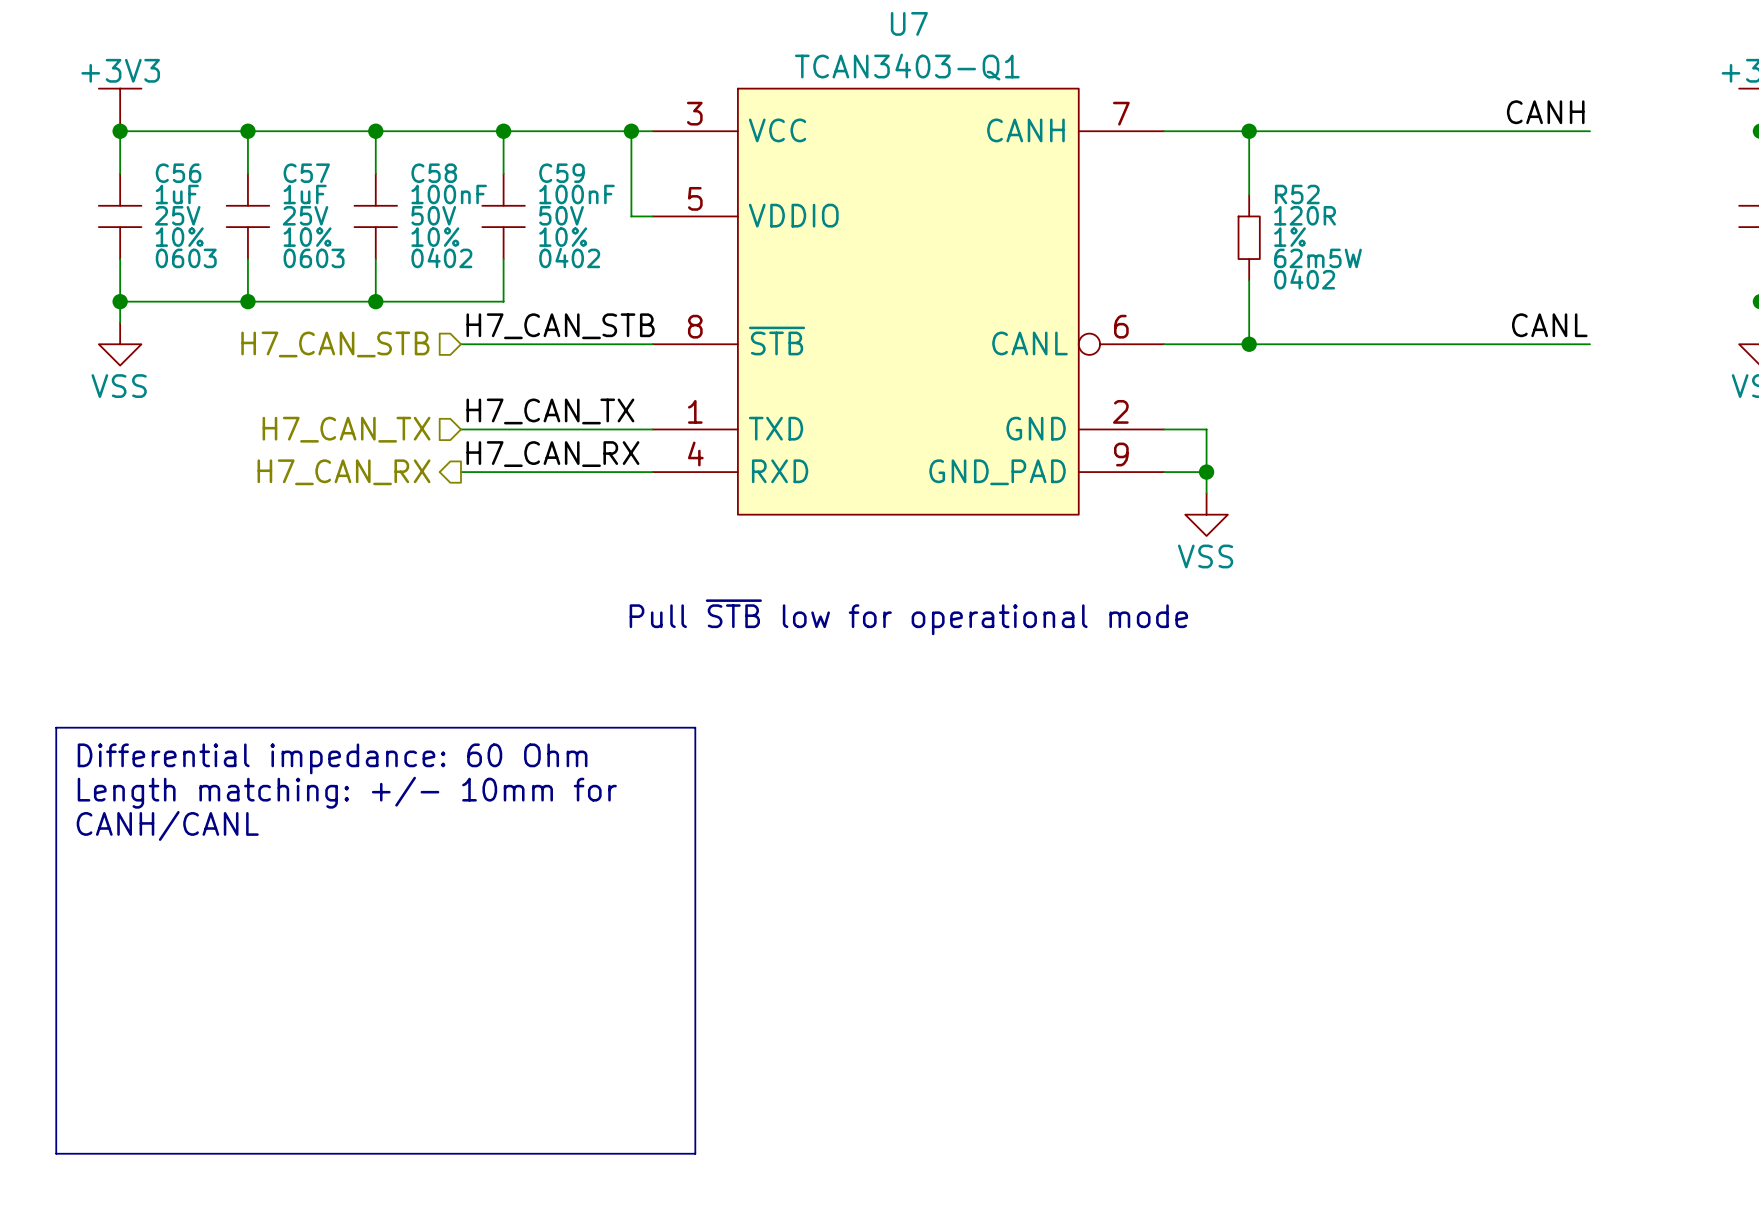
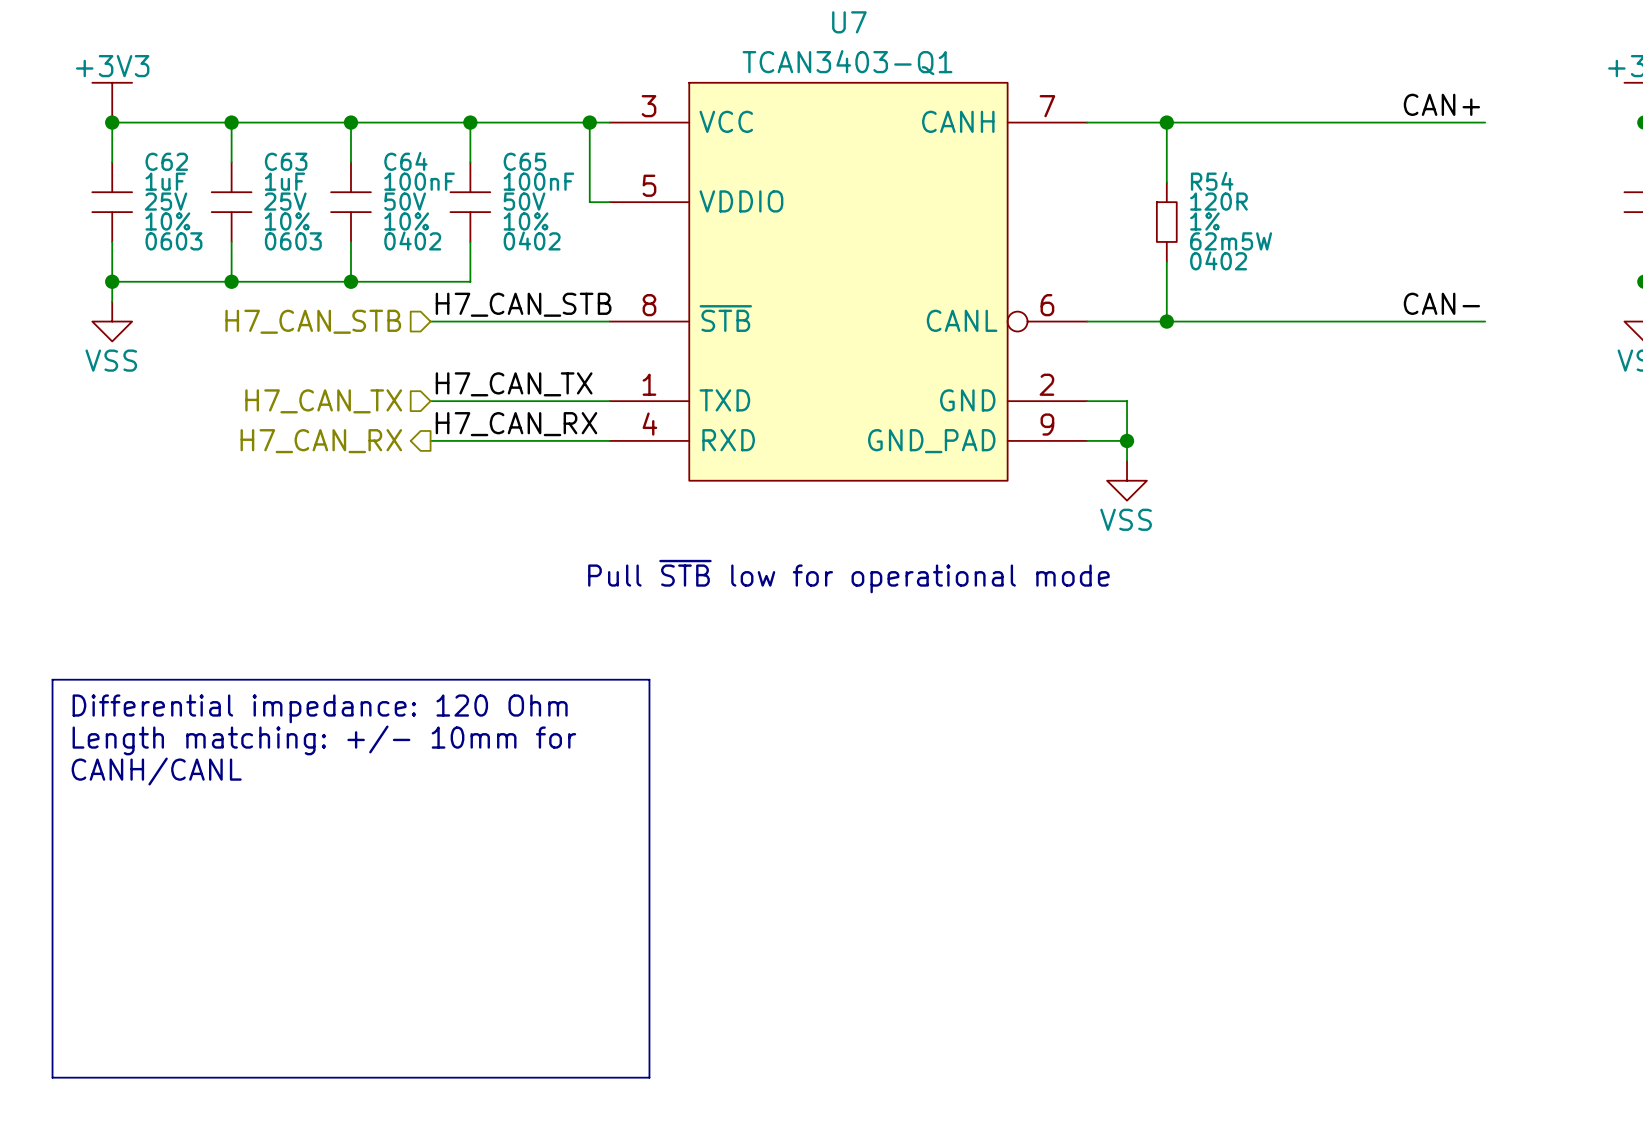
label: CANH (1545, 112) -> CAN+ (1441, 104)
C56 name: C56 (178, 173) -> C62 (166, 161)
C57 name: C57 (306, 173) -> C63 (286, 161)
C58 name: C58 (434, 173) -> C64 (405, 161)
C59 name: C59 (561, 173) -> C65 (524, 161)
R52 name: R52 (1297, 194) -> R54 (1212, 181)
label: CANL (1549, 325) -> CAN- (1441, 303)
text: Differential impedance: 60 Ohm (332, 758) -> Differential impedance: 120 Ohm (320, 708)

